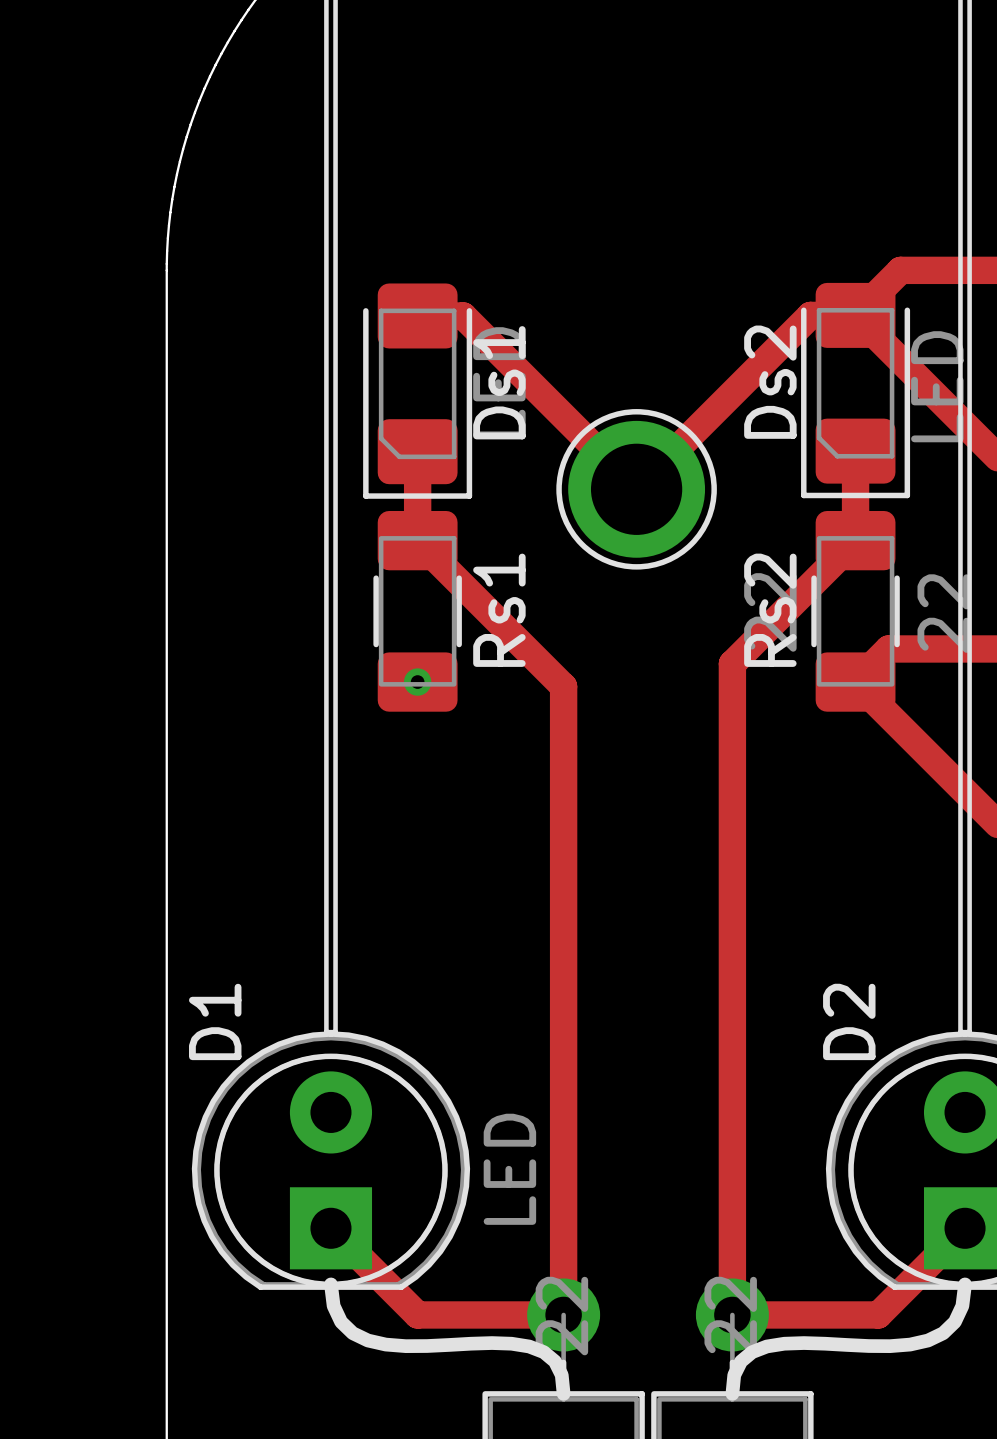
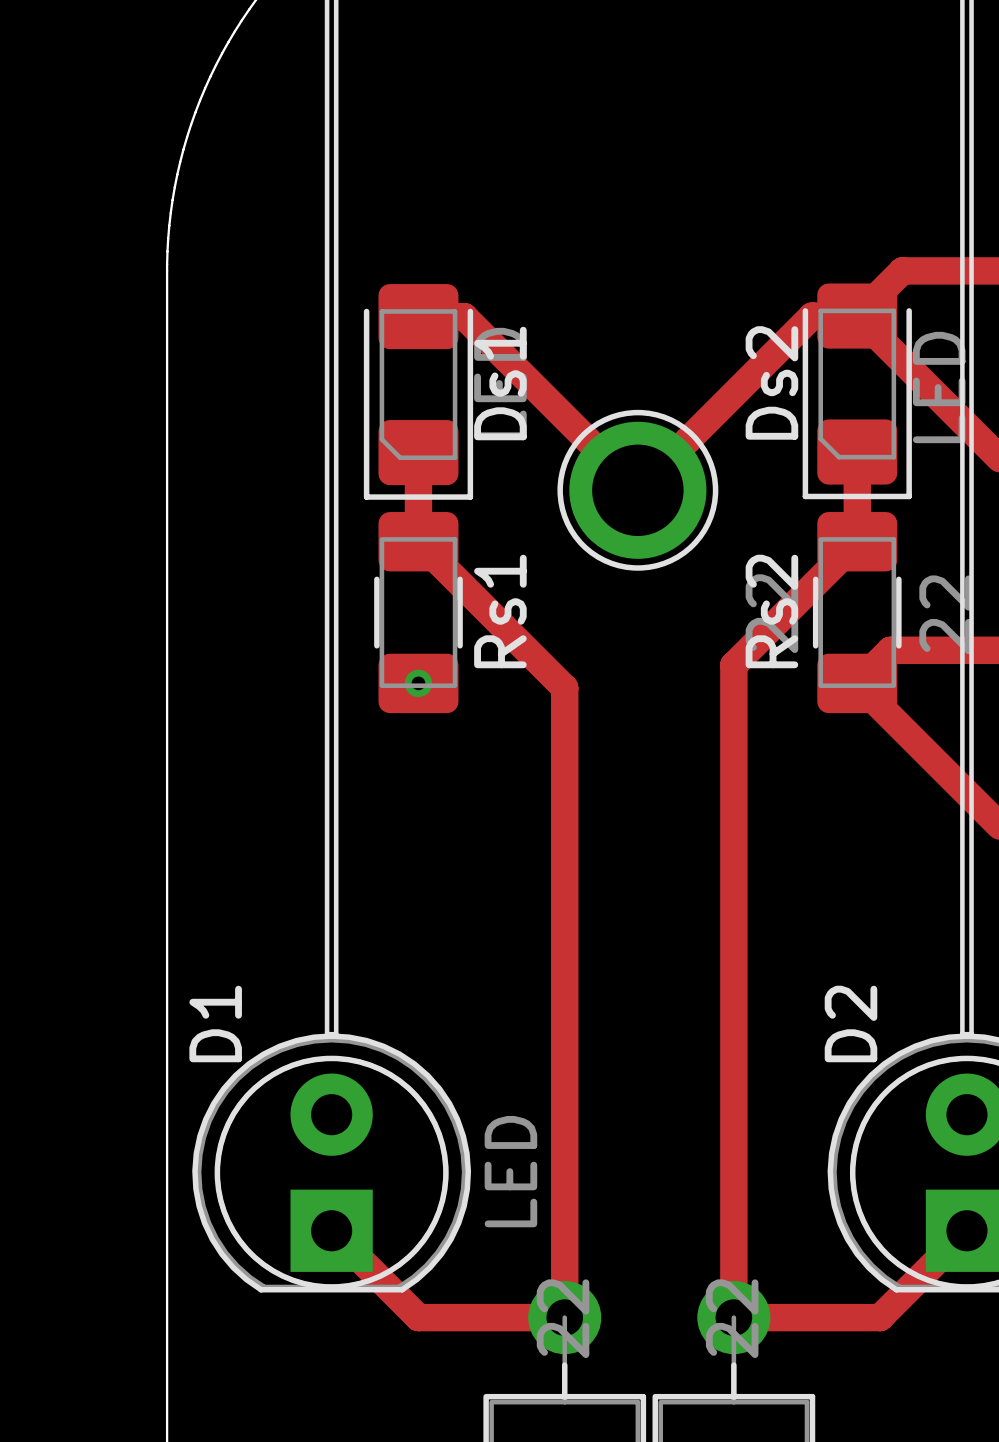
line: (330, 1284) (333, 1305) (341, 1321) (352, 1333) (367, 1340) (405, 1346) (492, 1343) (529, 1346) (543, 1352) (554, 1361) (561, 1375) (563, 1393) -> none
line: (965, 1284) (962, 1305) (954, 1321) (943, 1333) (928, 1340) (890, 1346) (804, 1343) (766, 1346) (752, 1352) (741, 1361) (734, 1375) (732, 1393) -> none

